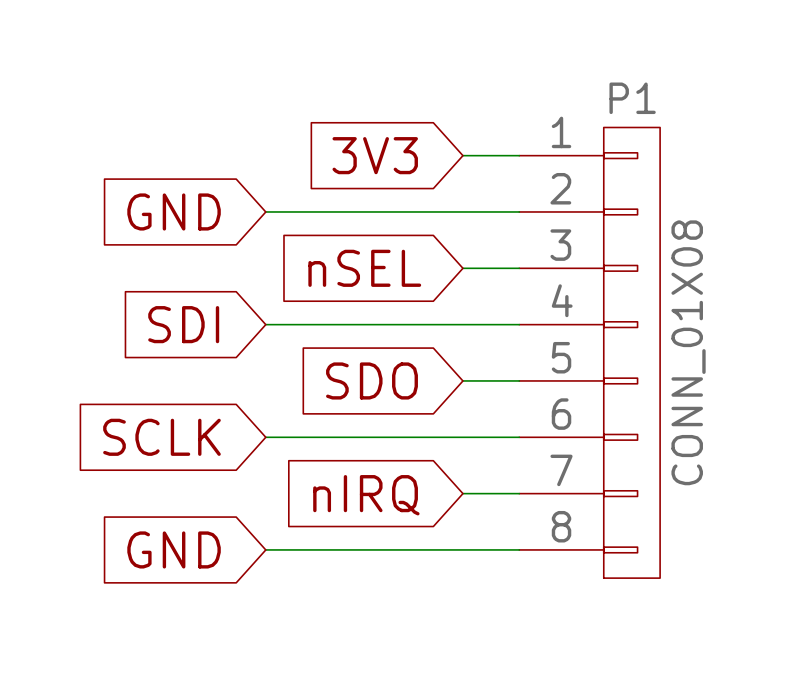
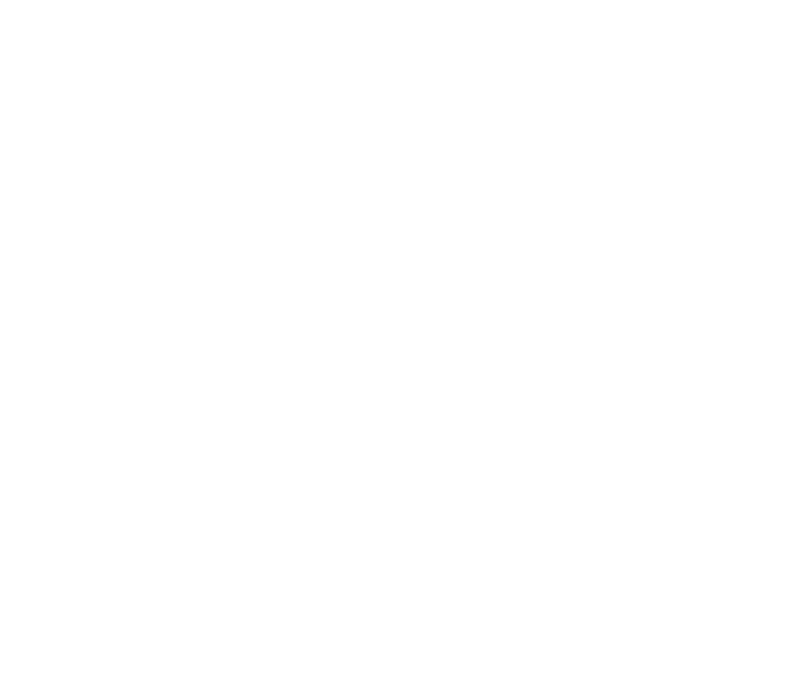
global label: 3V3 (375, 155) -> none
wire: (462, 155) (519, 155) -> none
global label: GND (174, 211) -> none
wire: (265, 211) (519, 211) -> none
global label: nSEL (364, 268) -> none
wire: (462, 268) (519, 268) -> none
global label: SDI (183, 324) -> none
wire: (265, 324) (519, 324) -> none
P1: CONN_01X08 (589, 352) -> none
global label: SDO (372, 380) -> none
wire: (462, 380) (519, 380) -> none
global label: SCLK (161, 437) -> none
wire: (265, 437) (519, 437) -> none
wire: (462, 493) (519, 493) -> none
global label: nIRQ (366, 495) -> none
global label: GND (174, 549) -> none
wire: (265, 549) (519, 549) -> none

